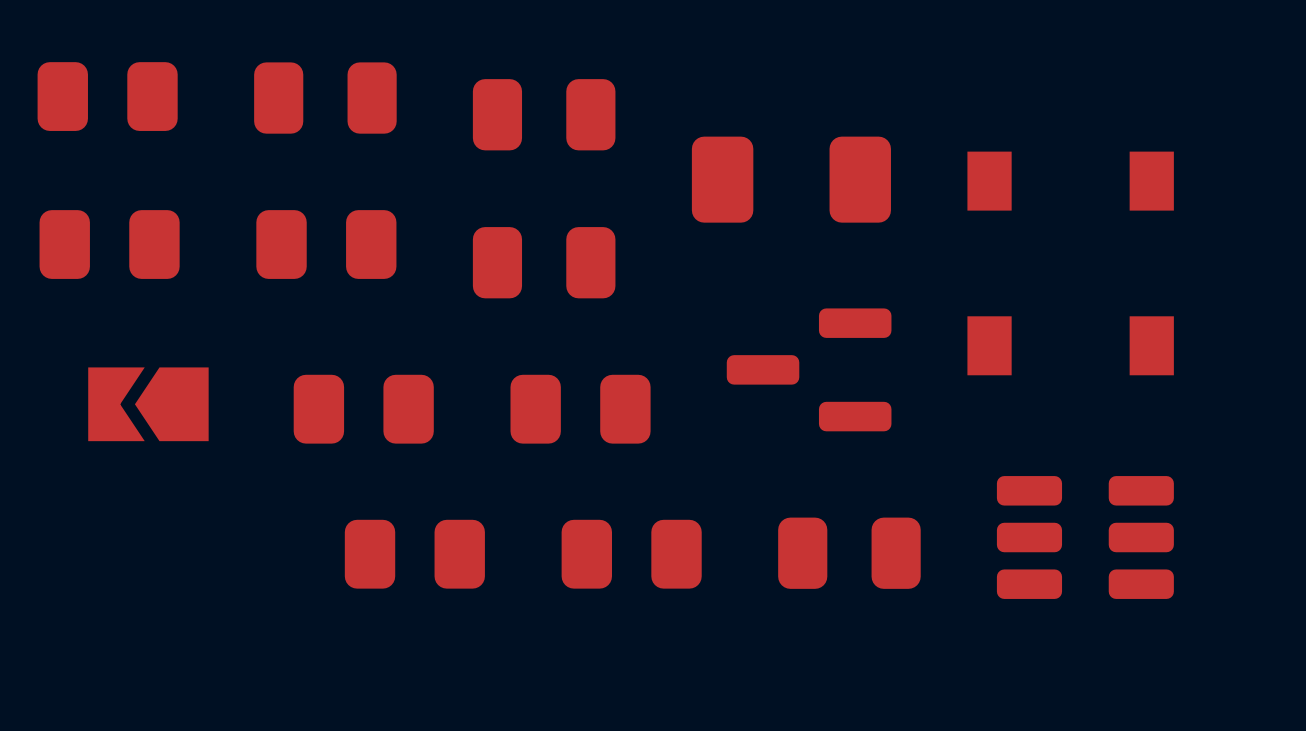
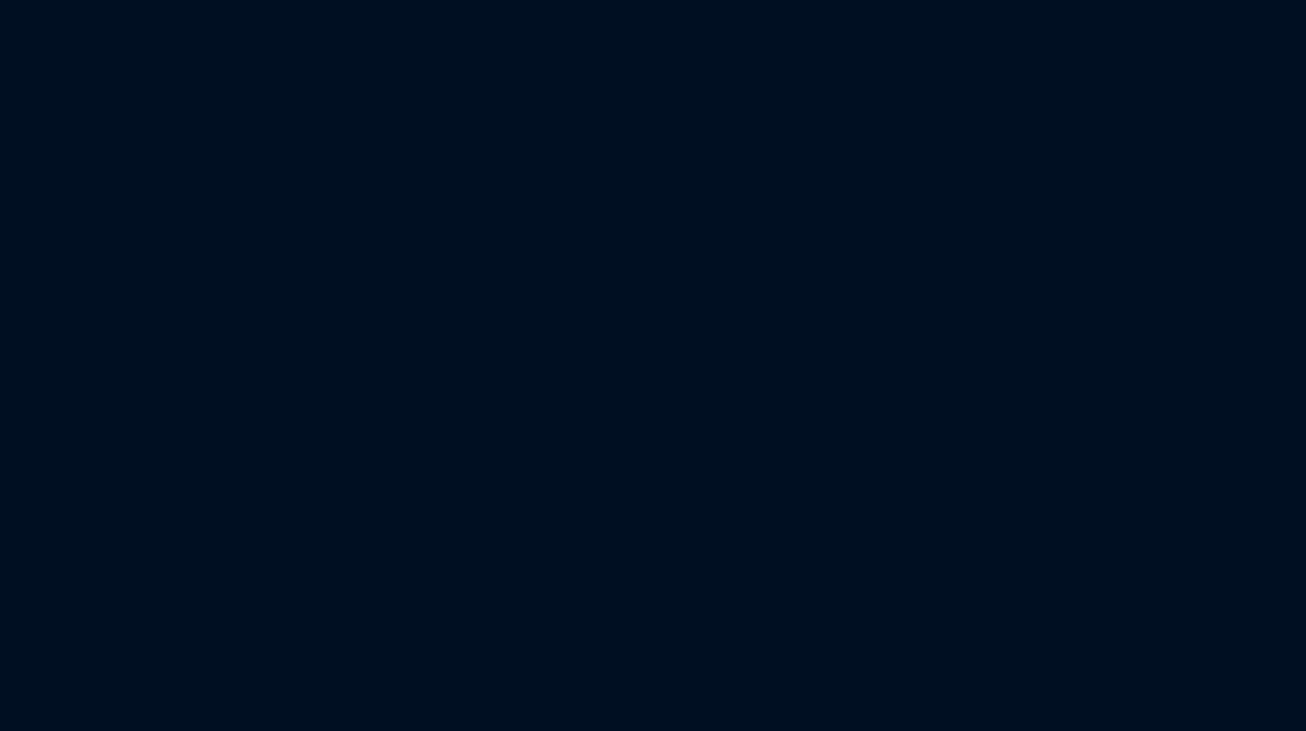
part: (107, 96) -> none
part: (325, 98) -> none
part: (544, 114) -> none
part: (791, 179) -> none
part: (1070, 181) -> none
part: (109, 244) -> none
part: (326, 244) -> none
part: (544, 262) -> none
part: (1070, 345) -> none
part: (809, 369) -> none
part: (148, 404) -> none
part: (363, 409) -> none
part: (580, 409) -> none
part: (1085, 537) -> none
part: (849, 553) -> none
part: (414, 554) -> none
part: (631, 554) -> none

